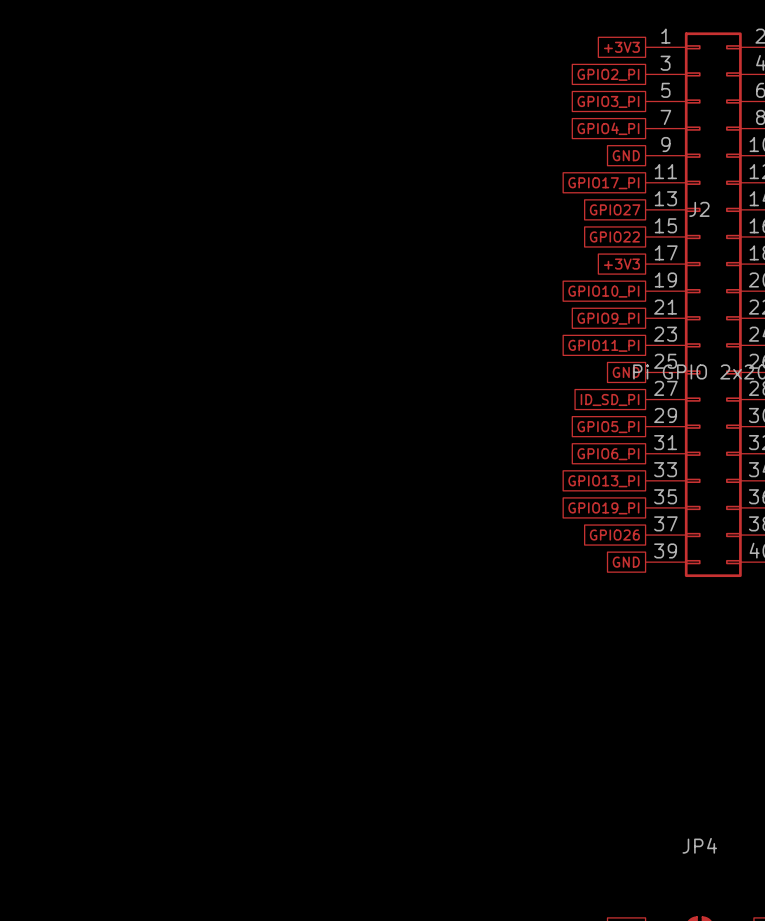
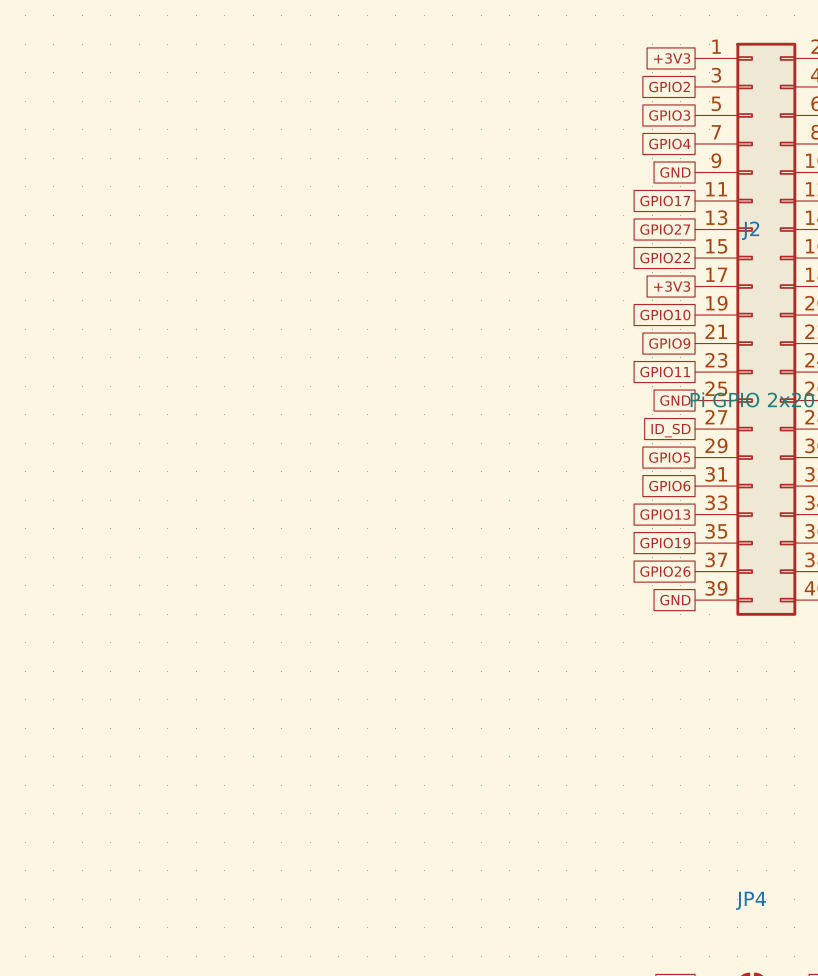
global label: GPIO2_PI (608, 74) -> GPIO2 (669, 86)
global label: GPIO3_PI (608, 101) -> GPIO3 (669, 115)
global label: GPIO4_PI (608, 128) -> GPIO4 (669, 143)
global label: GPIO17_PI (603, 183) -> GPIO17 (665, 201)
global label: GPIO10_PI (603, 291) -> GPIO10 (665, 315)
global label: GPIO9_PI (608, 318) -> GPIO9 (669, 343)
global label: GPIO11_PI (603, 345) -> GPIO11 (665, 372)
global label: ID_SD_PI (610, 400) -> ID_SD (670, 430)
global label: GPIO5_PI (608, 427) -> GPIO5 (669, 457)
global label: GPIO6_PI (608, 454) -> GPIO6 (669, 486)
global label: GPIO13_PI (603, 481) -> GPIO13 (665, 514)
global label: GPIO19_PI (603, 508) -> GPIO19 (665, 543)

